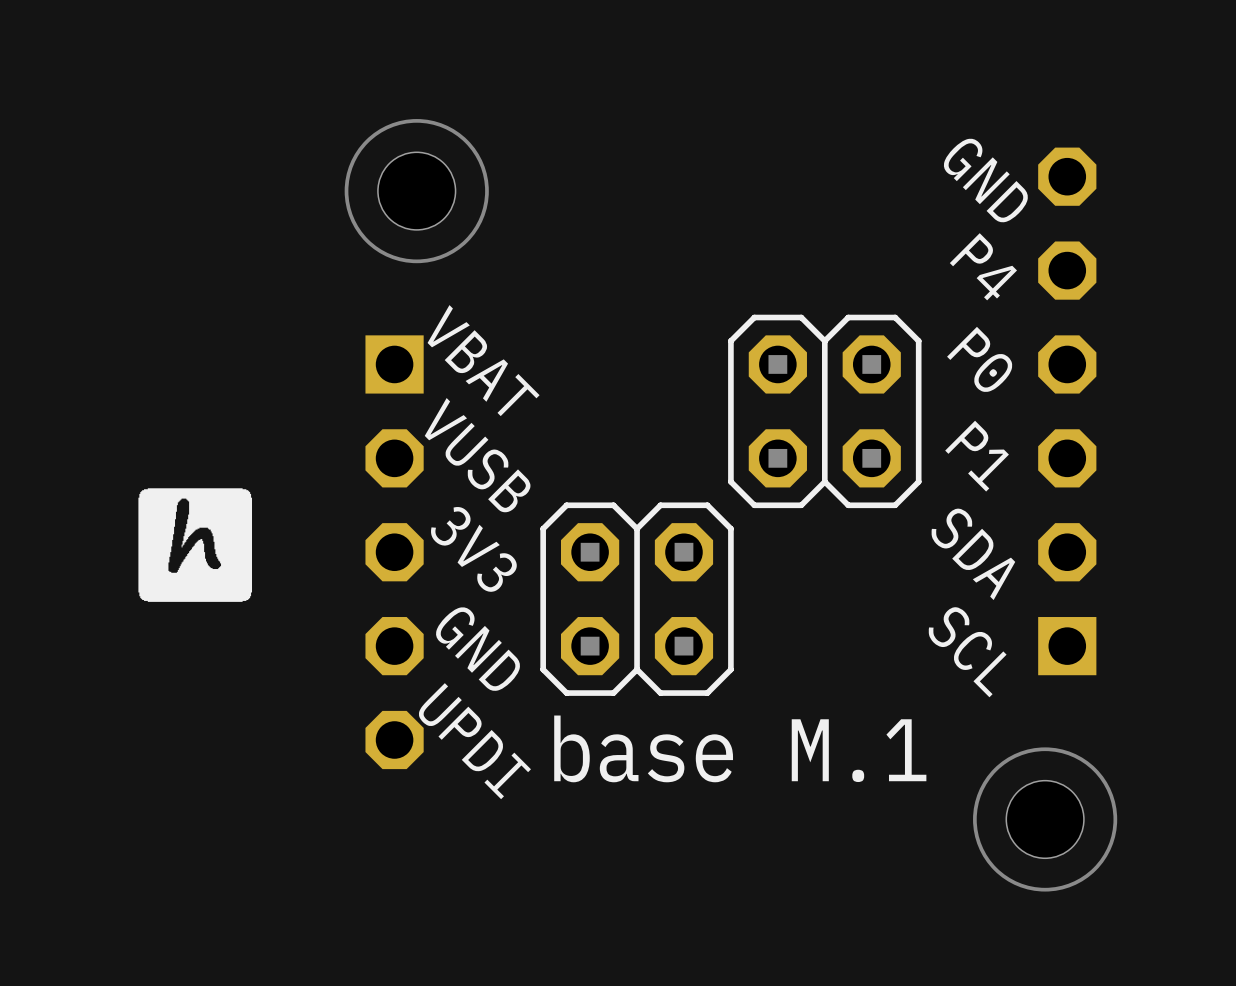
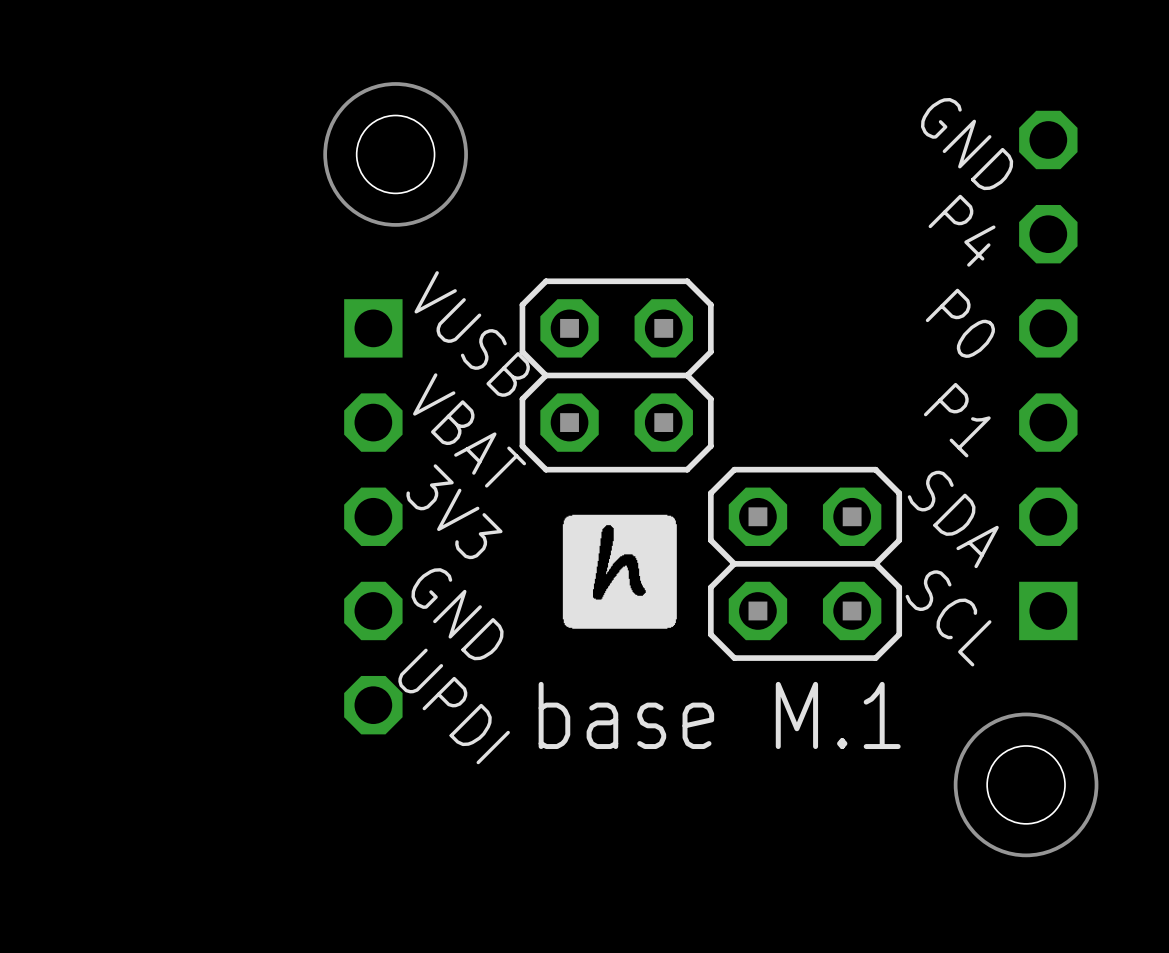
text position: VBAT (483, 360) -> VBAT (469, 430)
part: none -> (616, 375)
part: (824, 411) -> none
text position: VUSB (477, 455) -> VUSB (472, 333)
drawing: [138, 488, 253, 602] -> none
drawing: none -> [562, 514, 677, 629]
part: (637, 599) -> none
part: none -> (805, 563)

